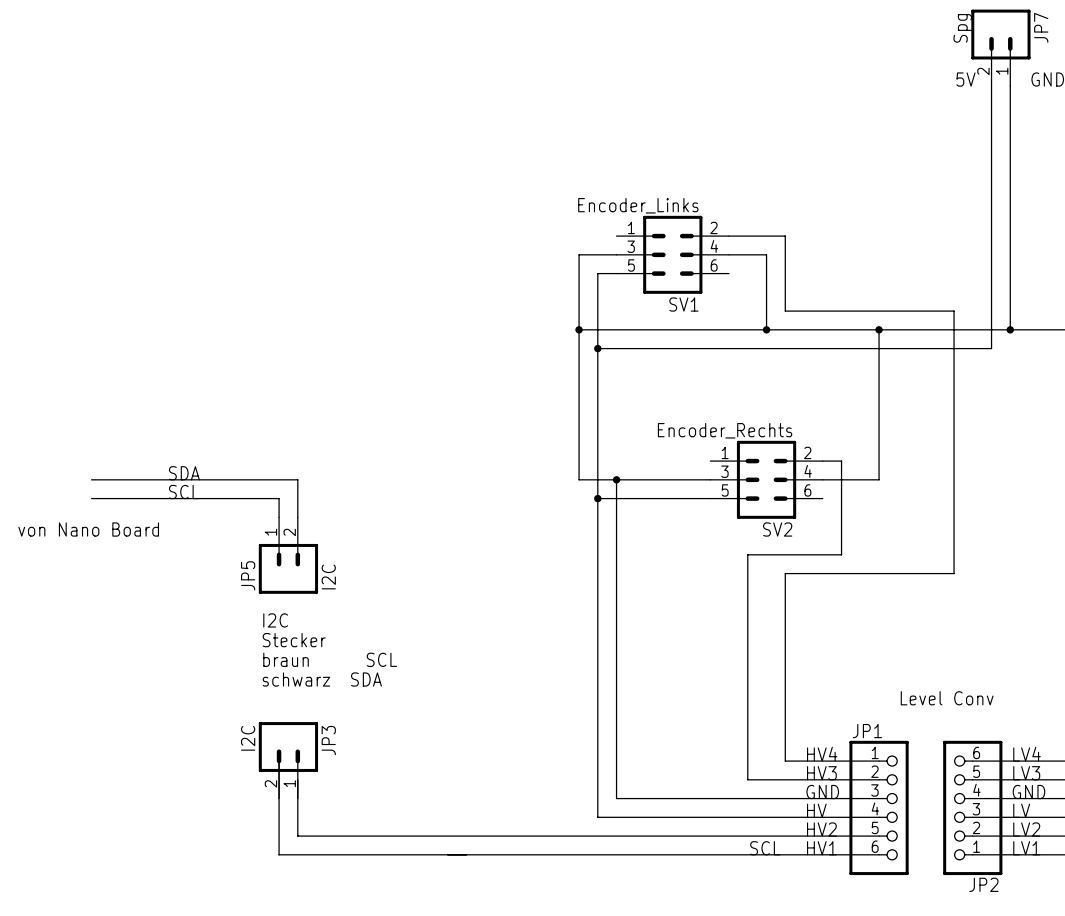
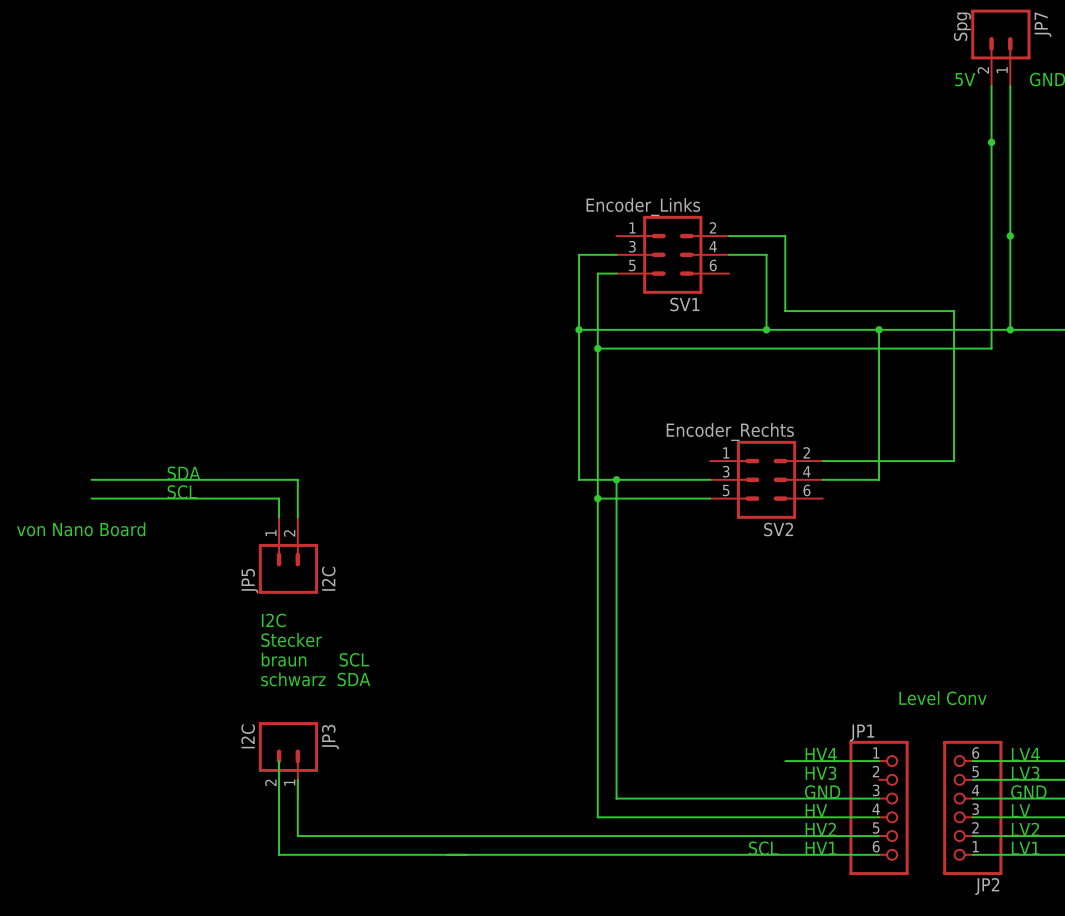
junction: none -> (991, 142)
junction: none -> (1010, 236)
wire: (841, 461) (841, 554) (747, 554) (747, 779) (879, 779) -> none
wire: (954, 461) (954, 573) (785, 573) (785, 761) -> (954, 461) (841, 461)

